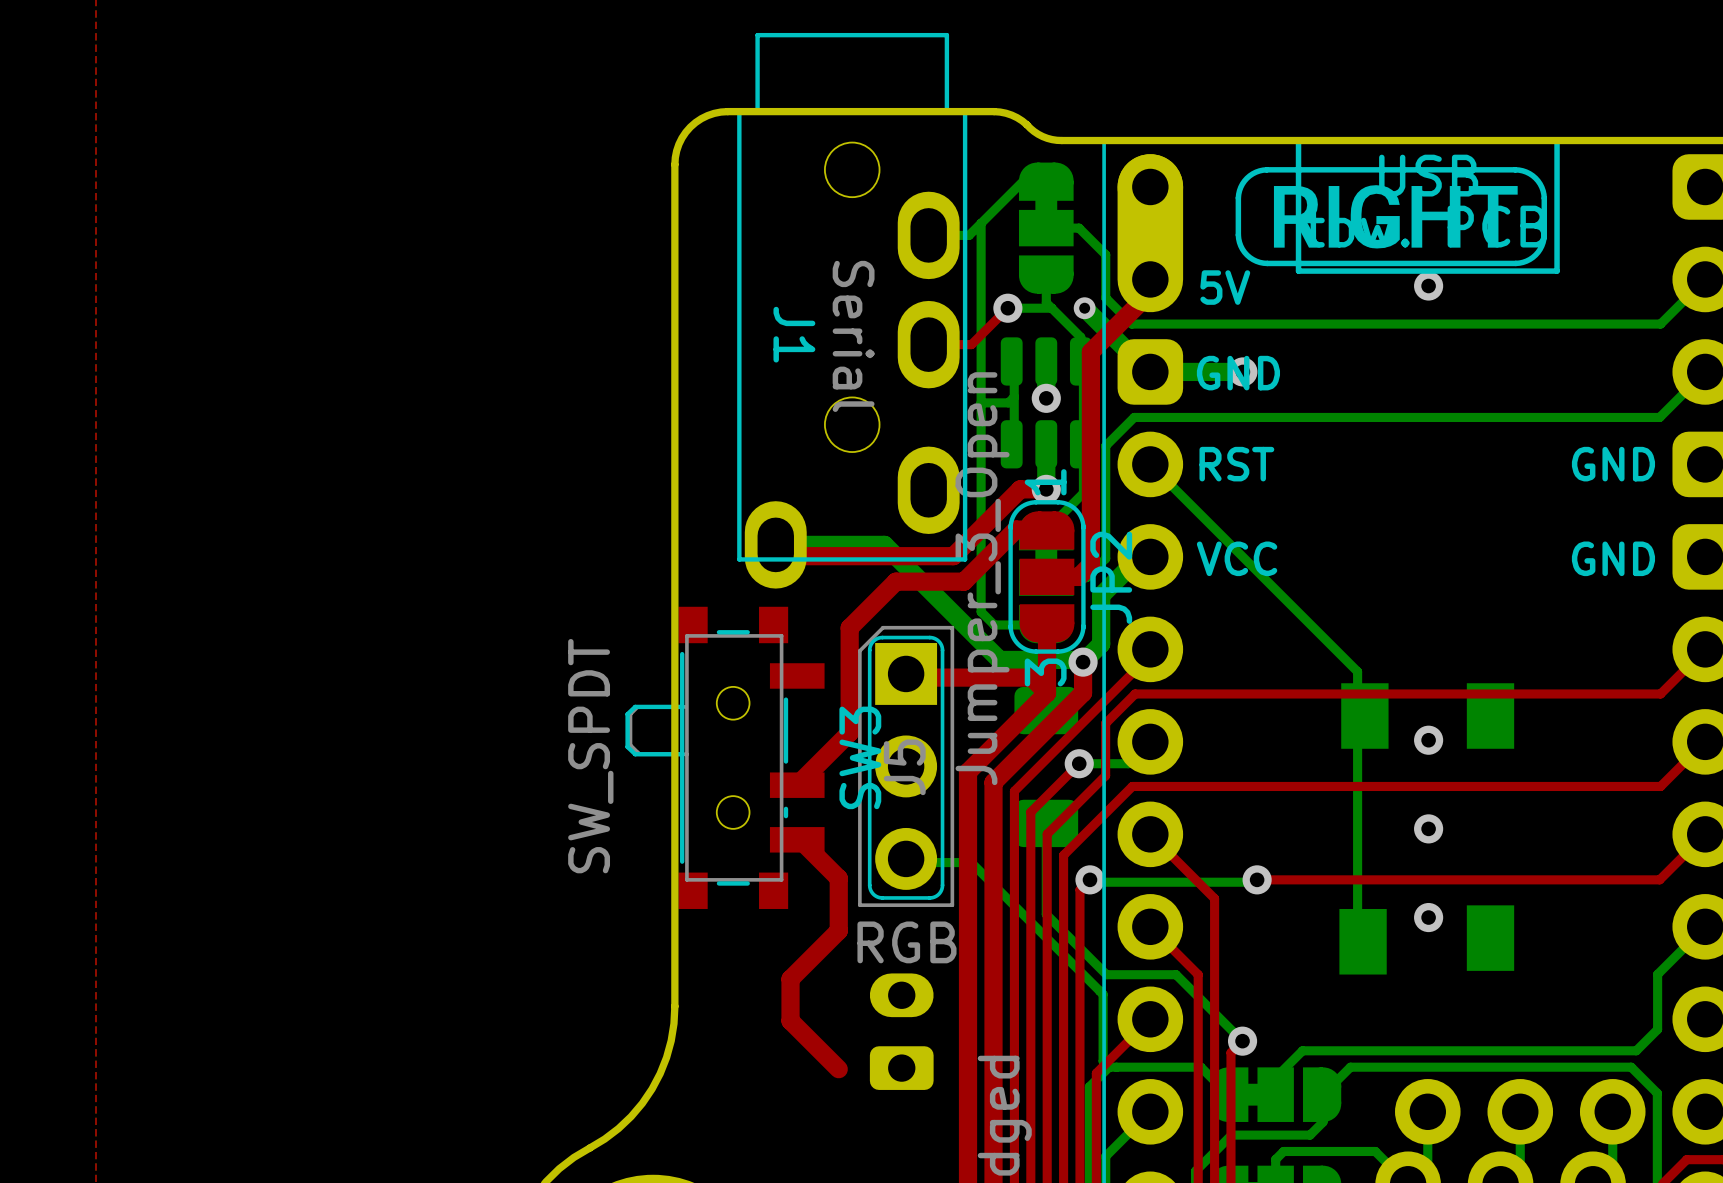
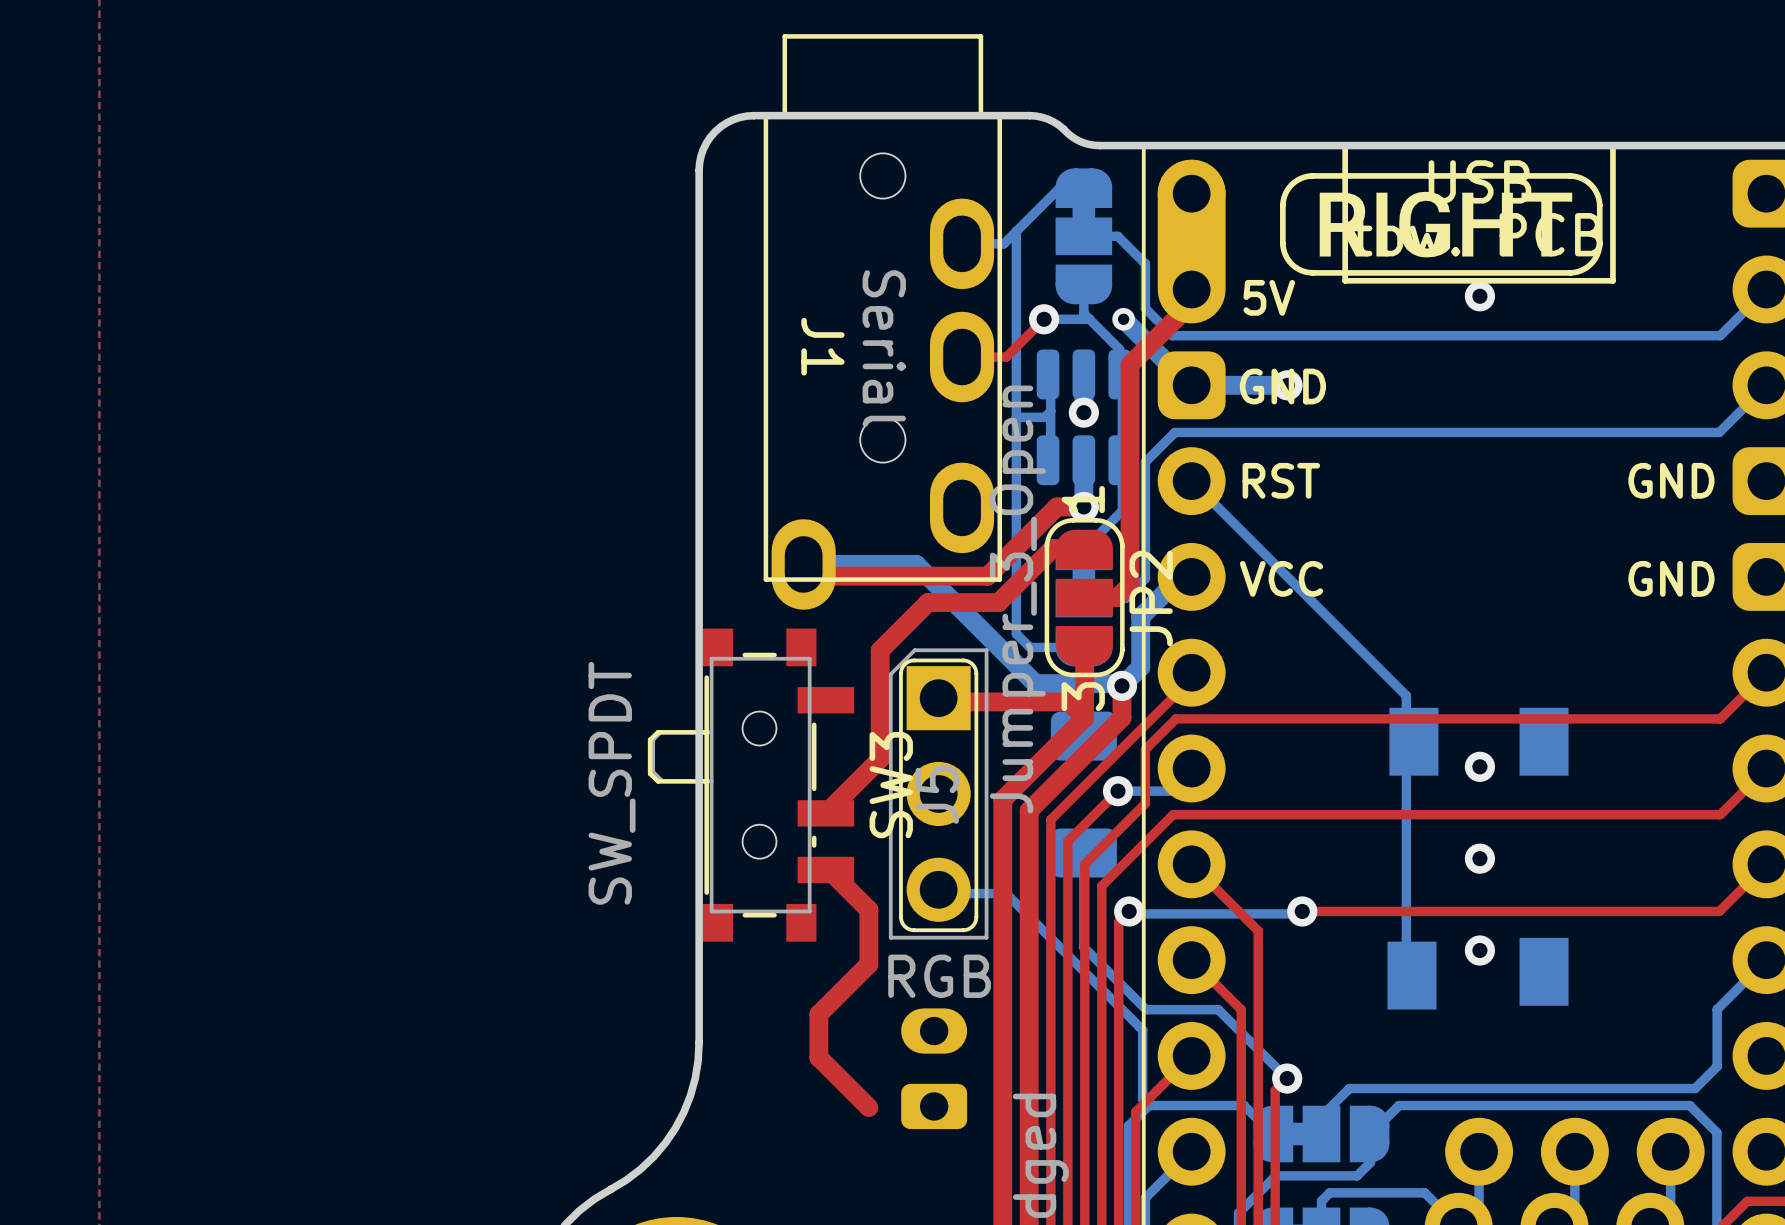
J1 footprint: [737, 32, 968, 589] -> [763, 34, 1003, 610]

